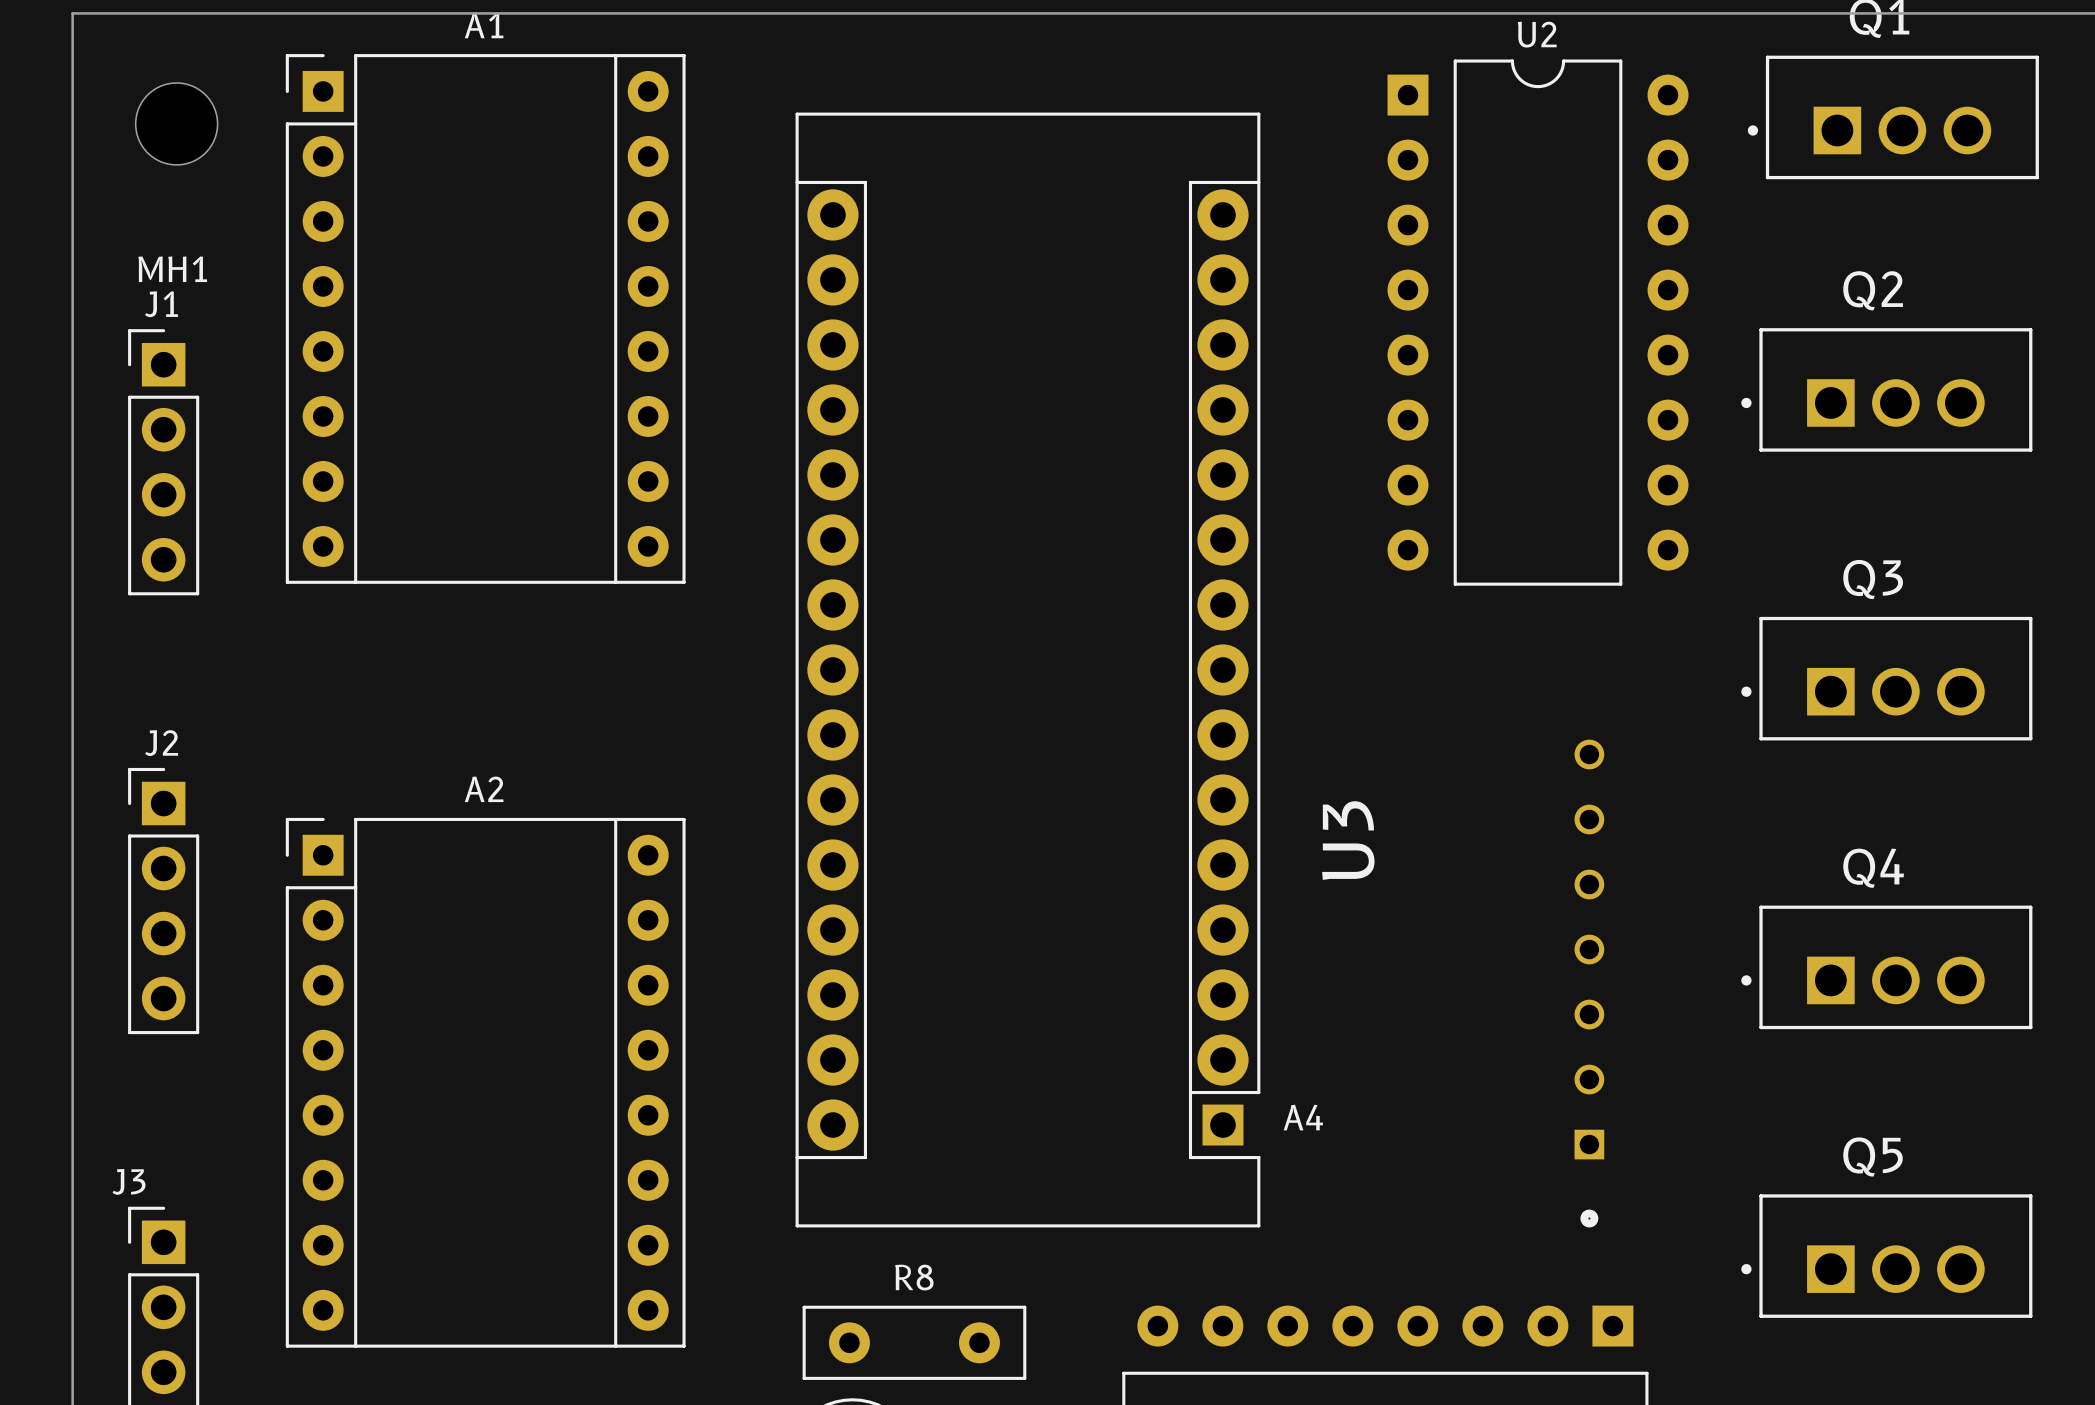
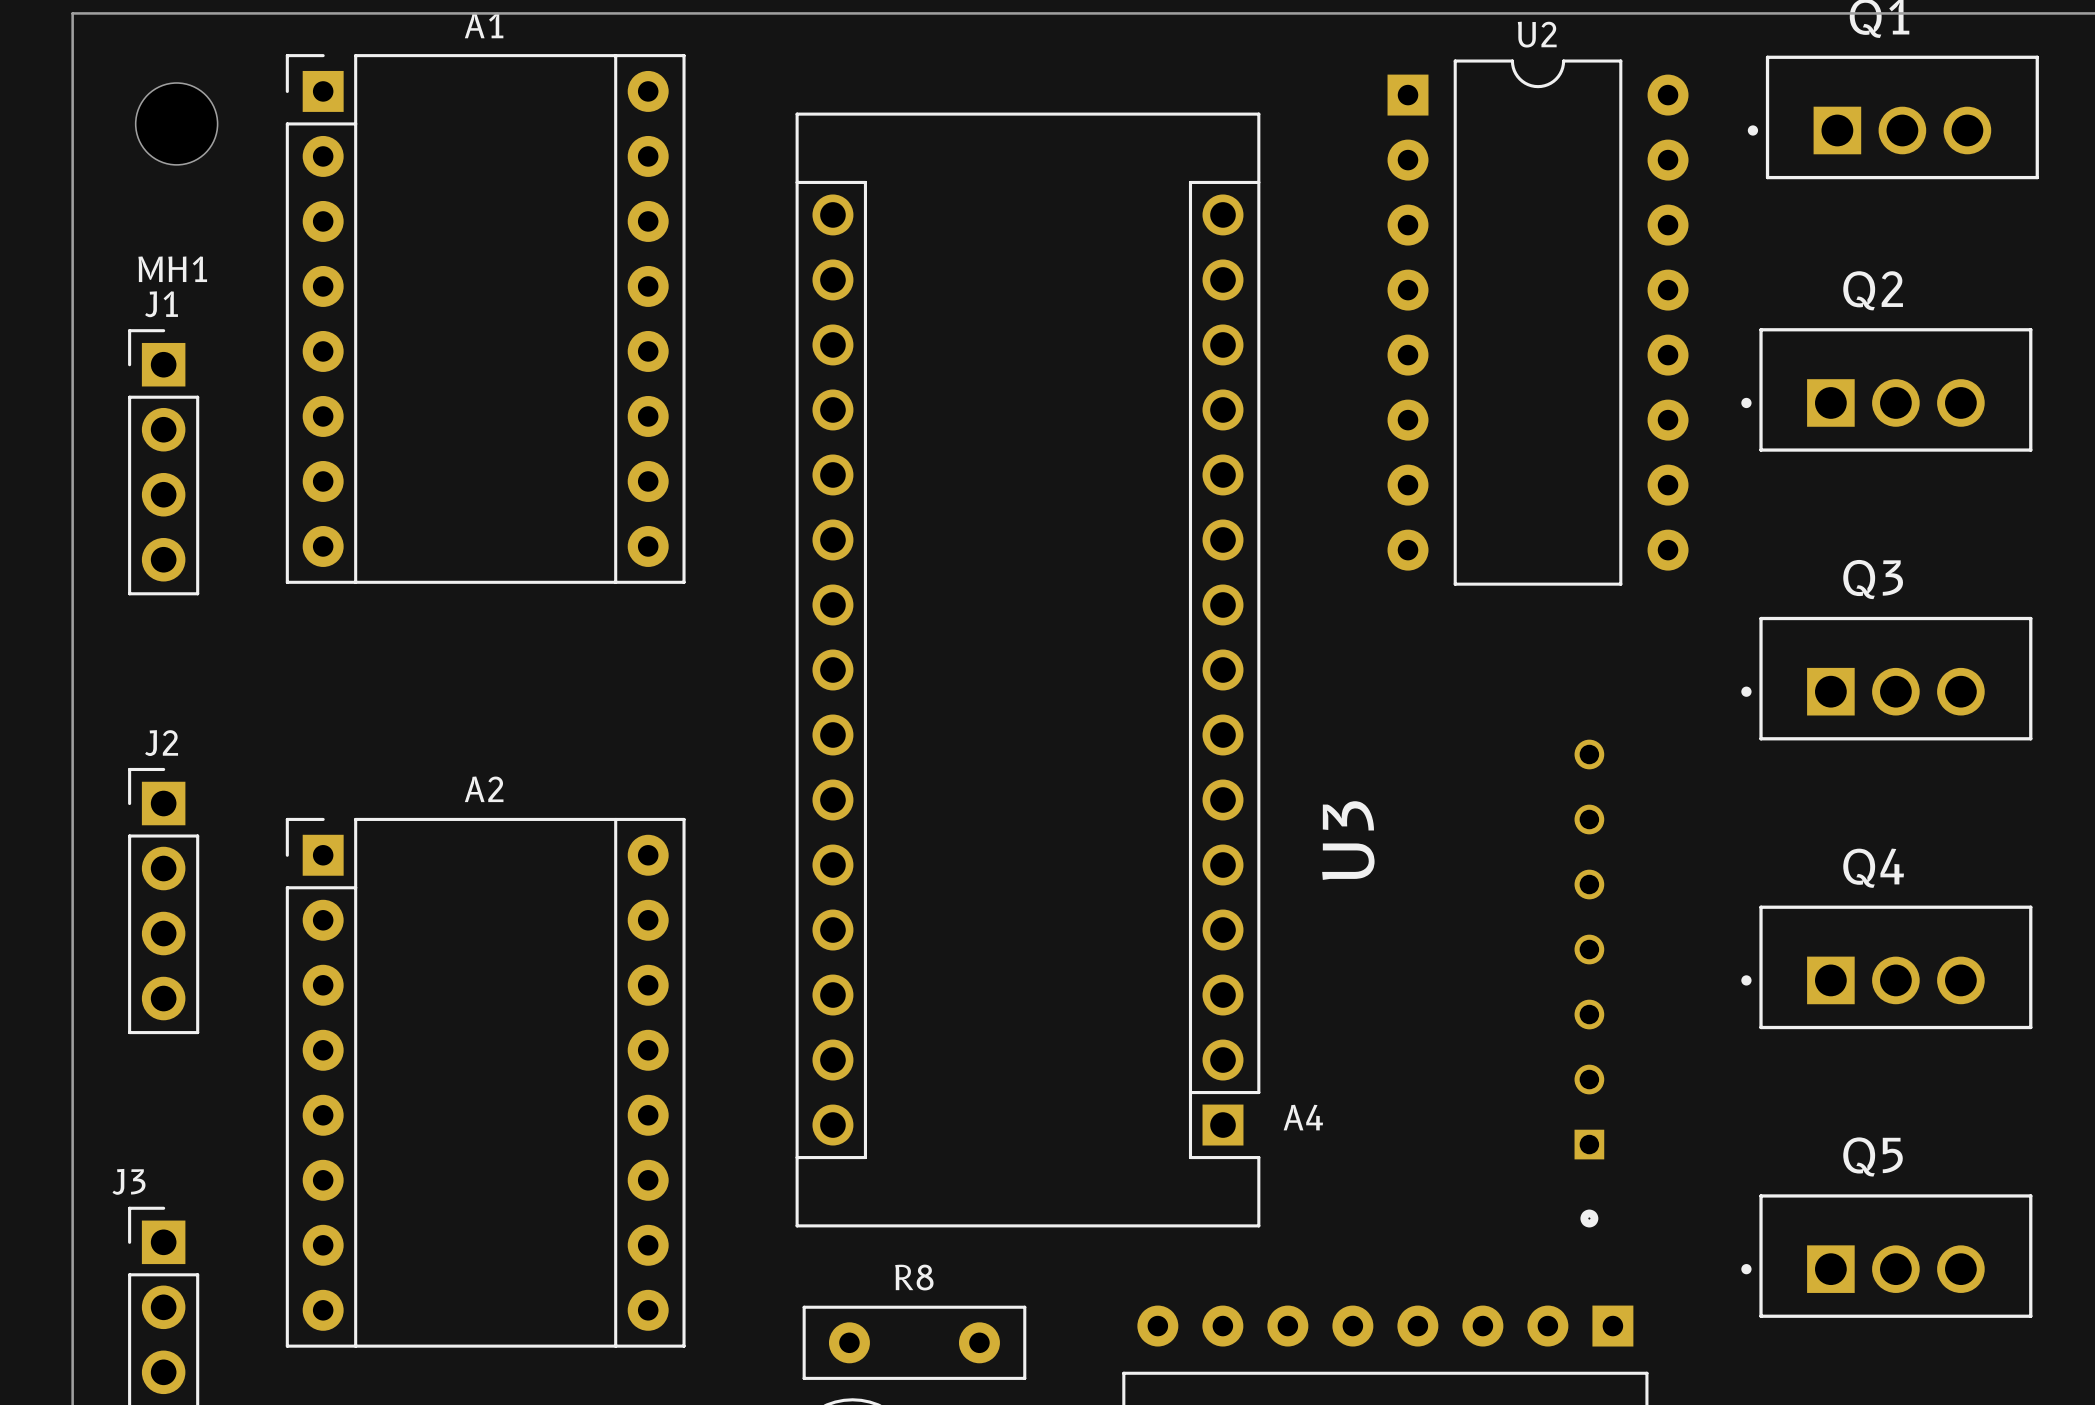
A4 footprint: [795, 112, 1261, 1228] -> [795, 112, 1261, 1228]

